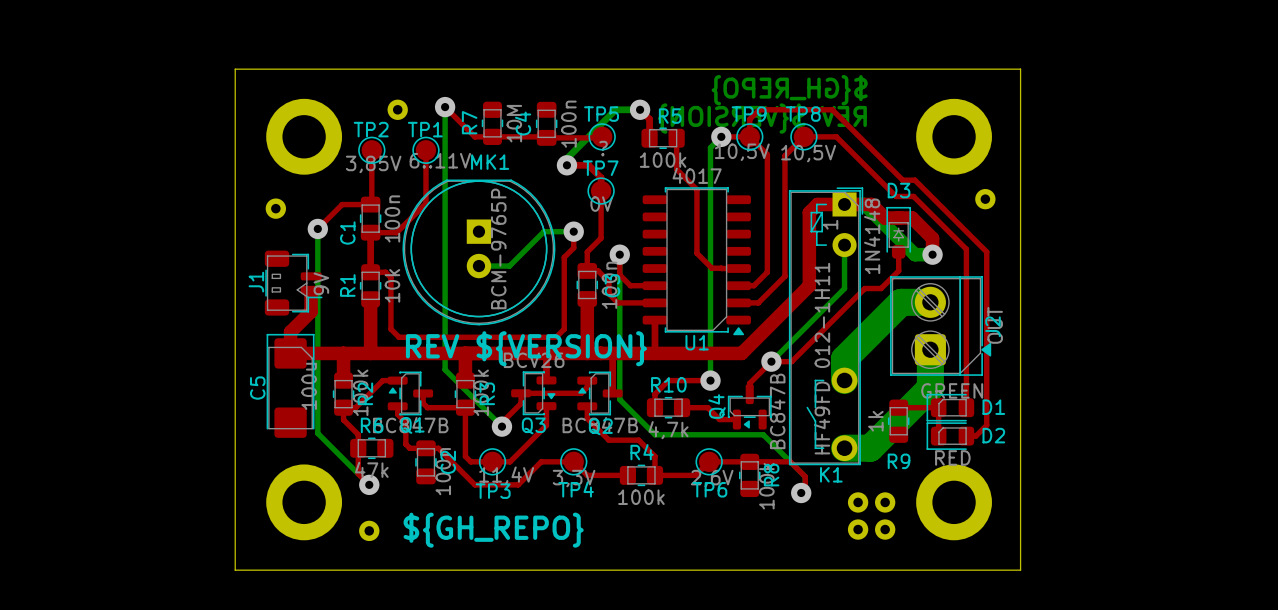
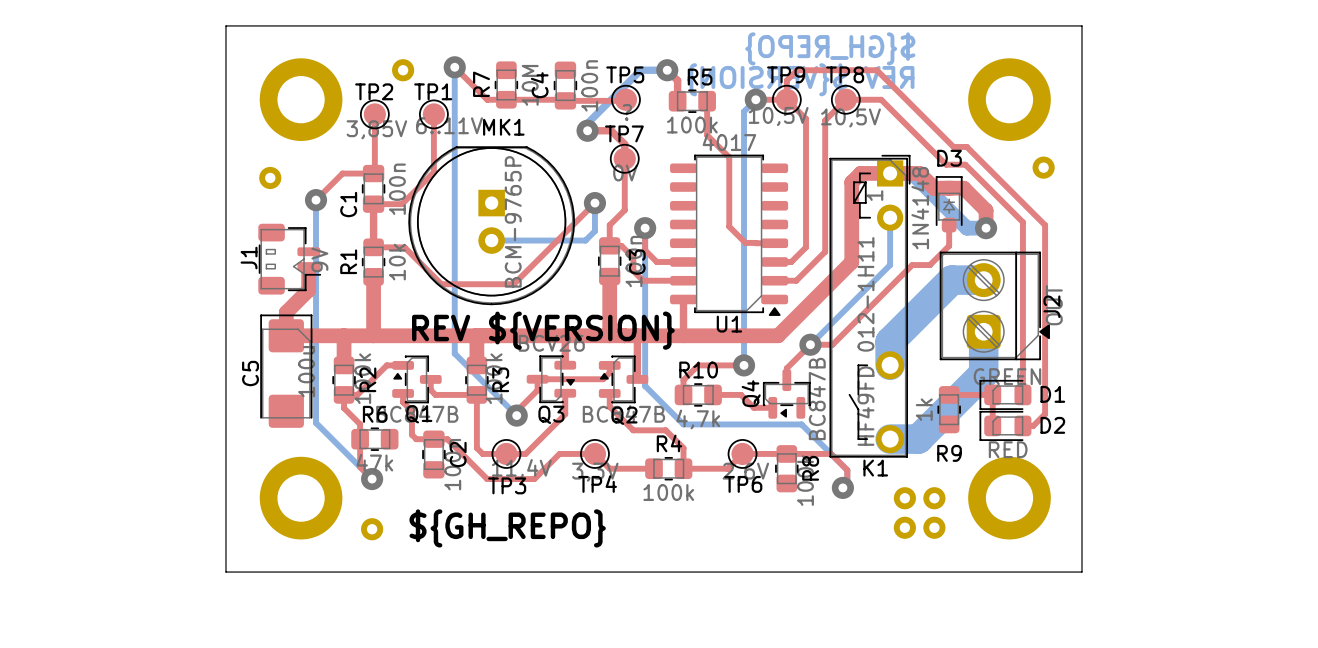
top track: (573, 231) (573, 247) (564, 257) (564, 329) (556, 337) (399, 337) (390, 329) (390, 277) (385, 272) -> (594, 203) (513, 284) (441, 284) (404, 247) (389, 247)
bottom track: (573, 231) (543, 231) (509, 266) -> (594, 203) (594, 231) (585, 240) (525, 240)

